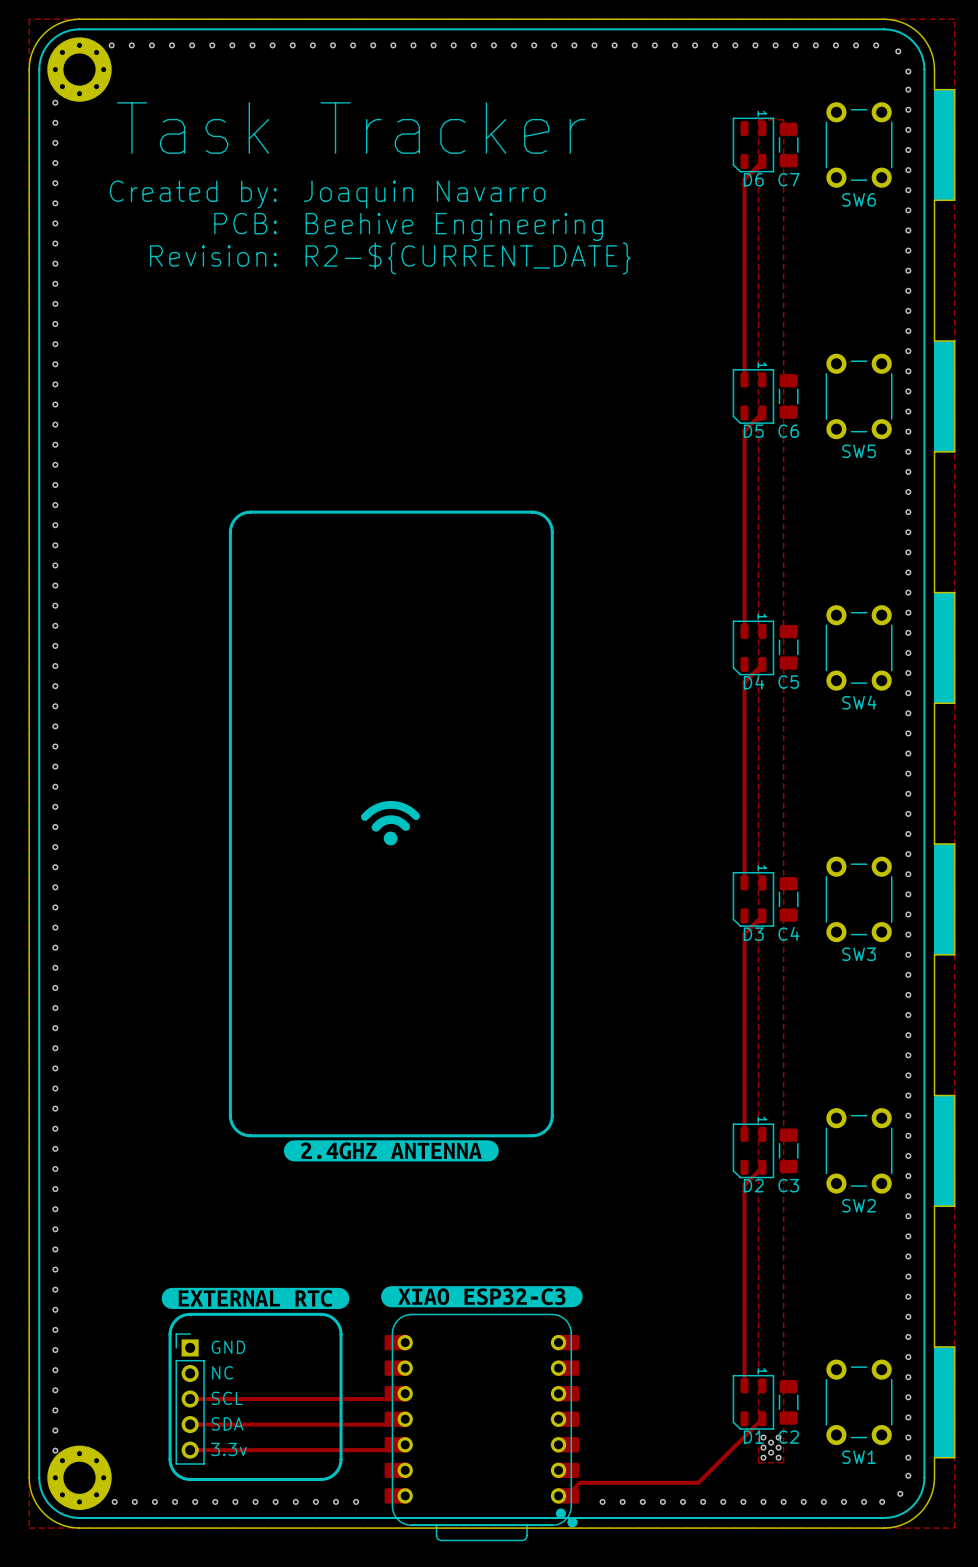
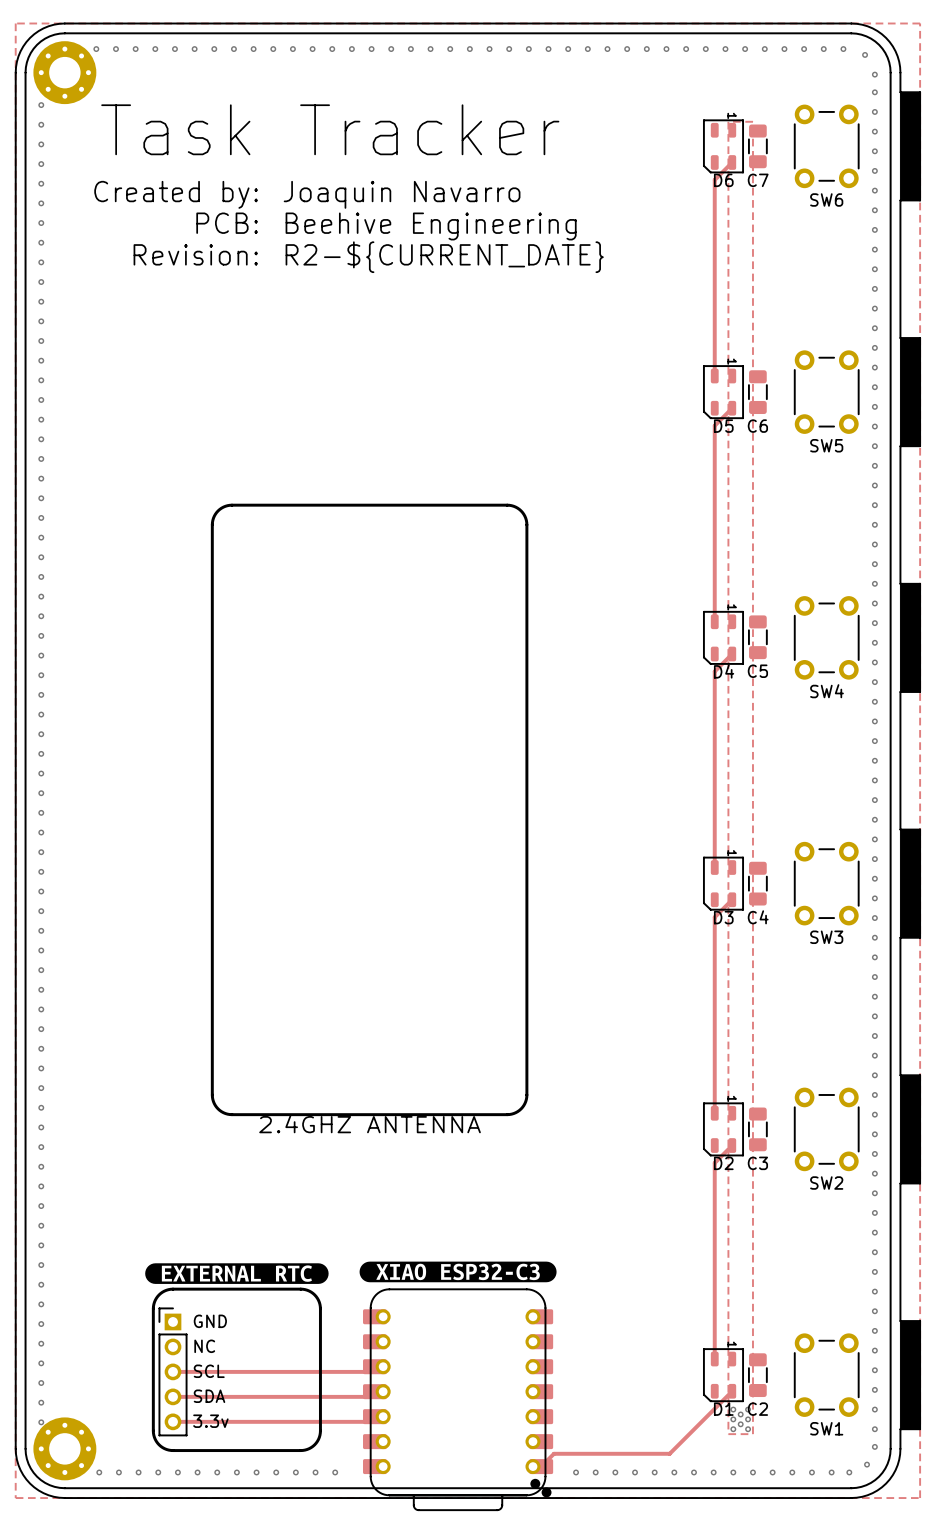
drawing: [361, 800, 420, 846] -> none
drawing: [283, 1140, 499, 1162] -> none
text: none -> 2.4GHZ ANTENNA (370, 1124)

